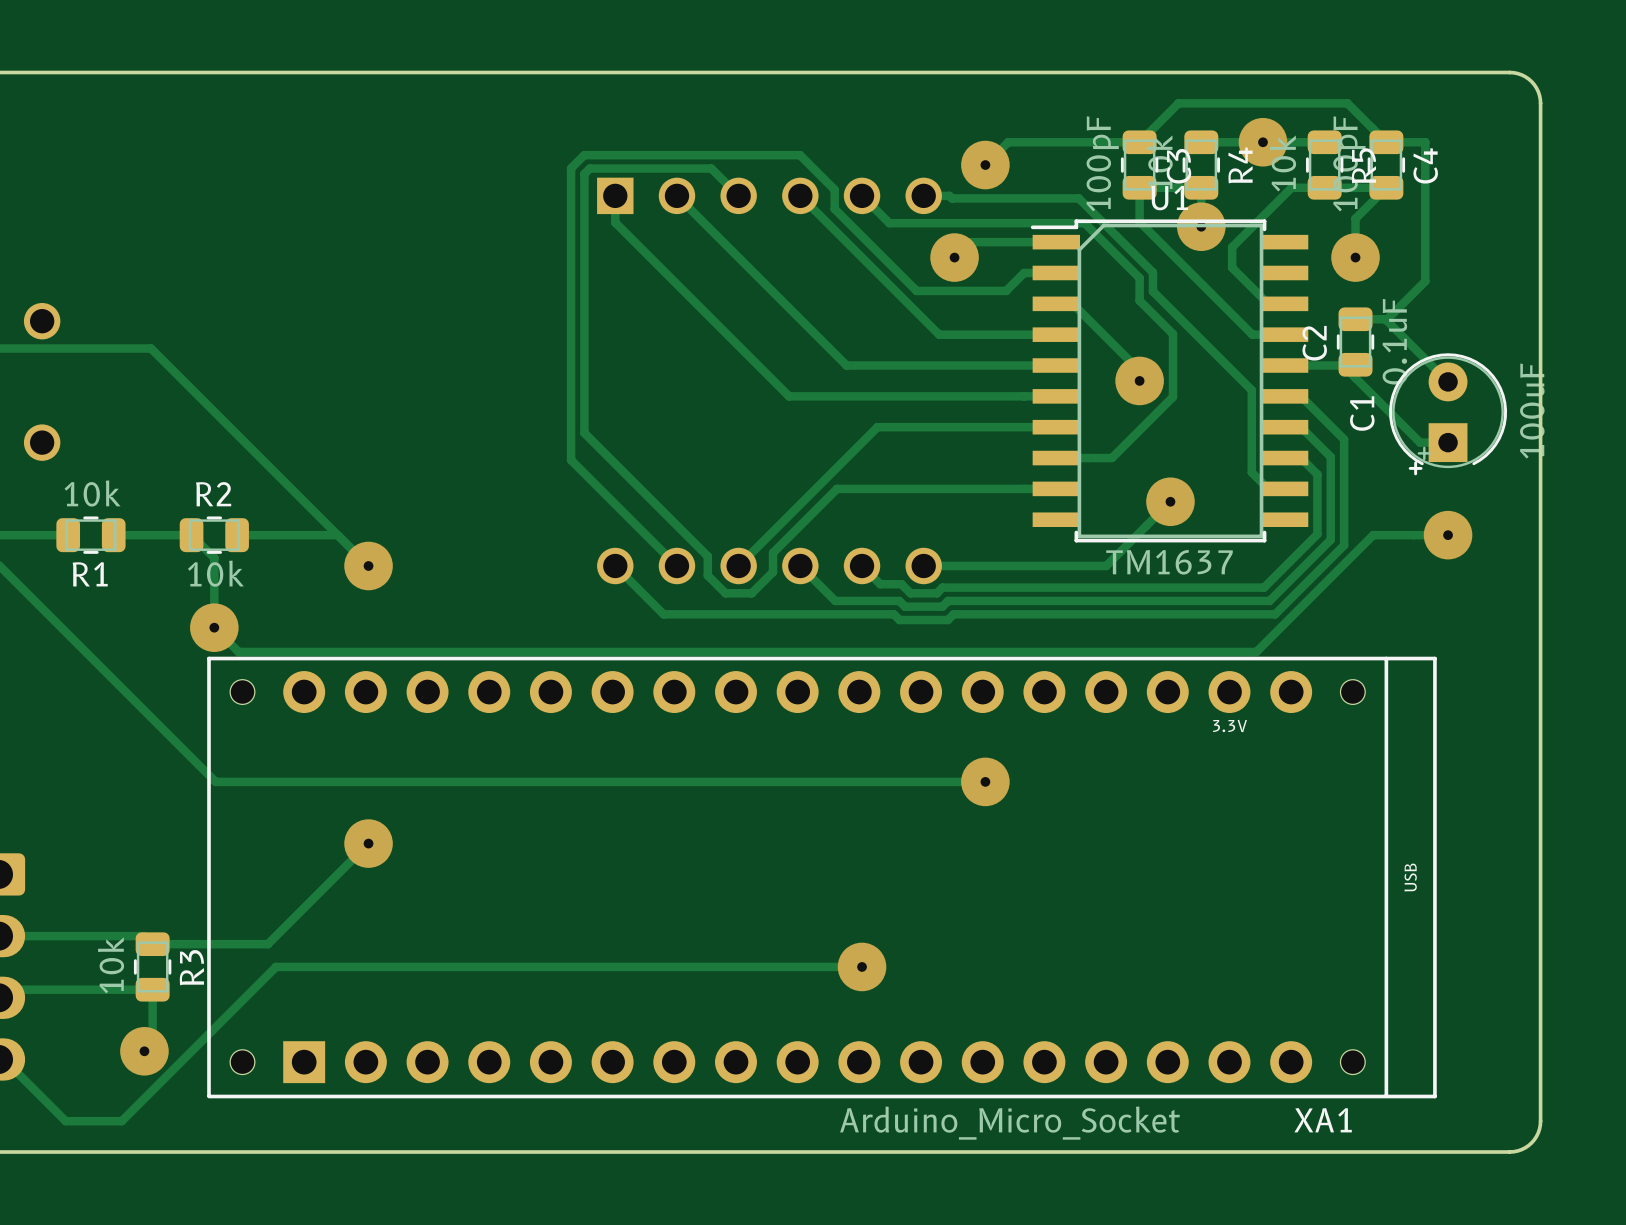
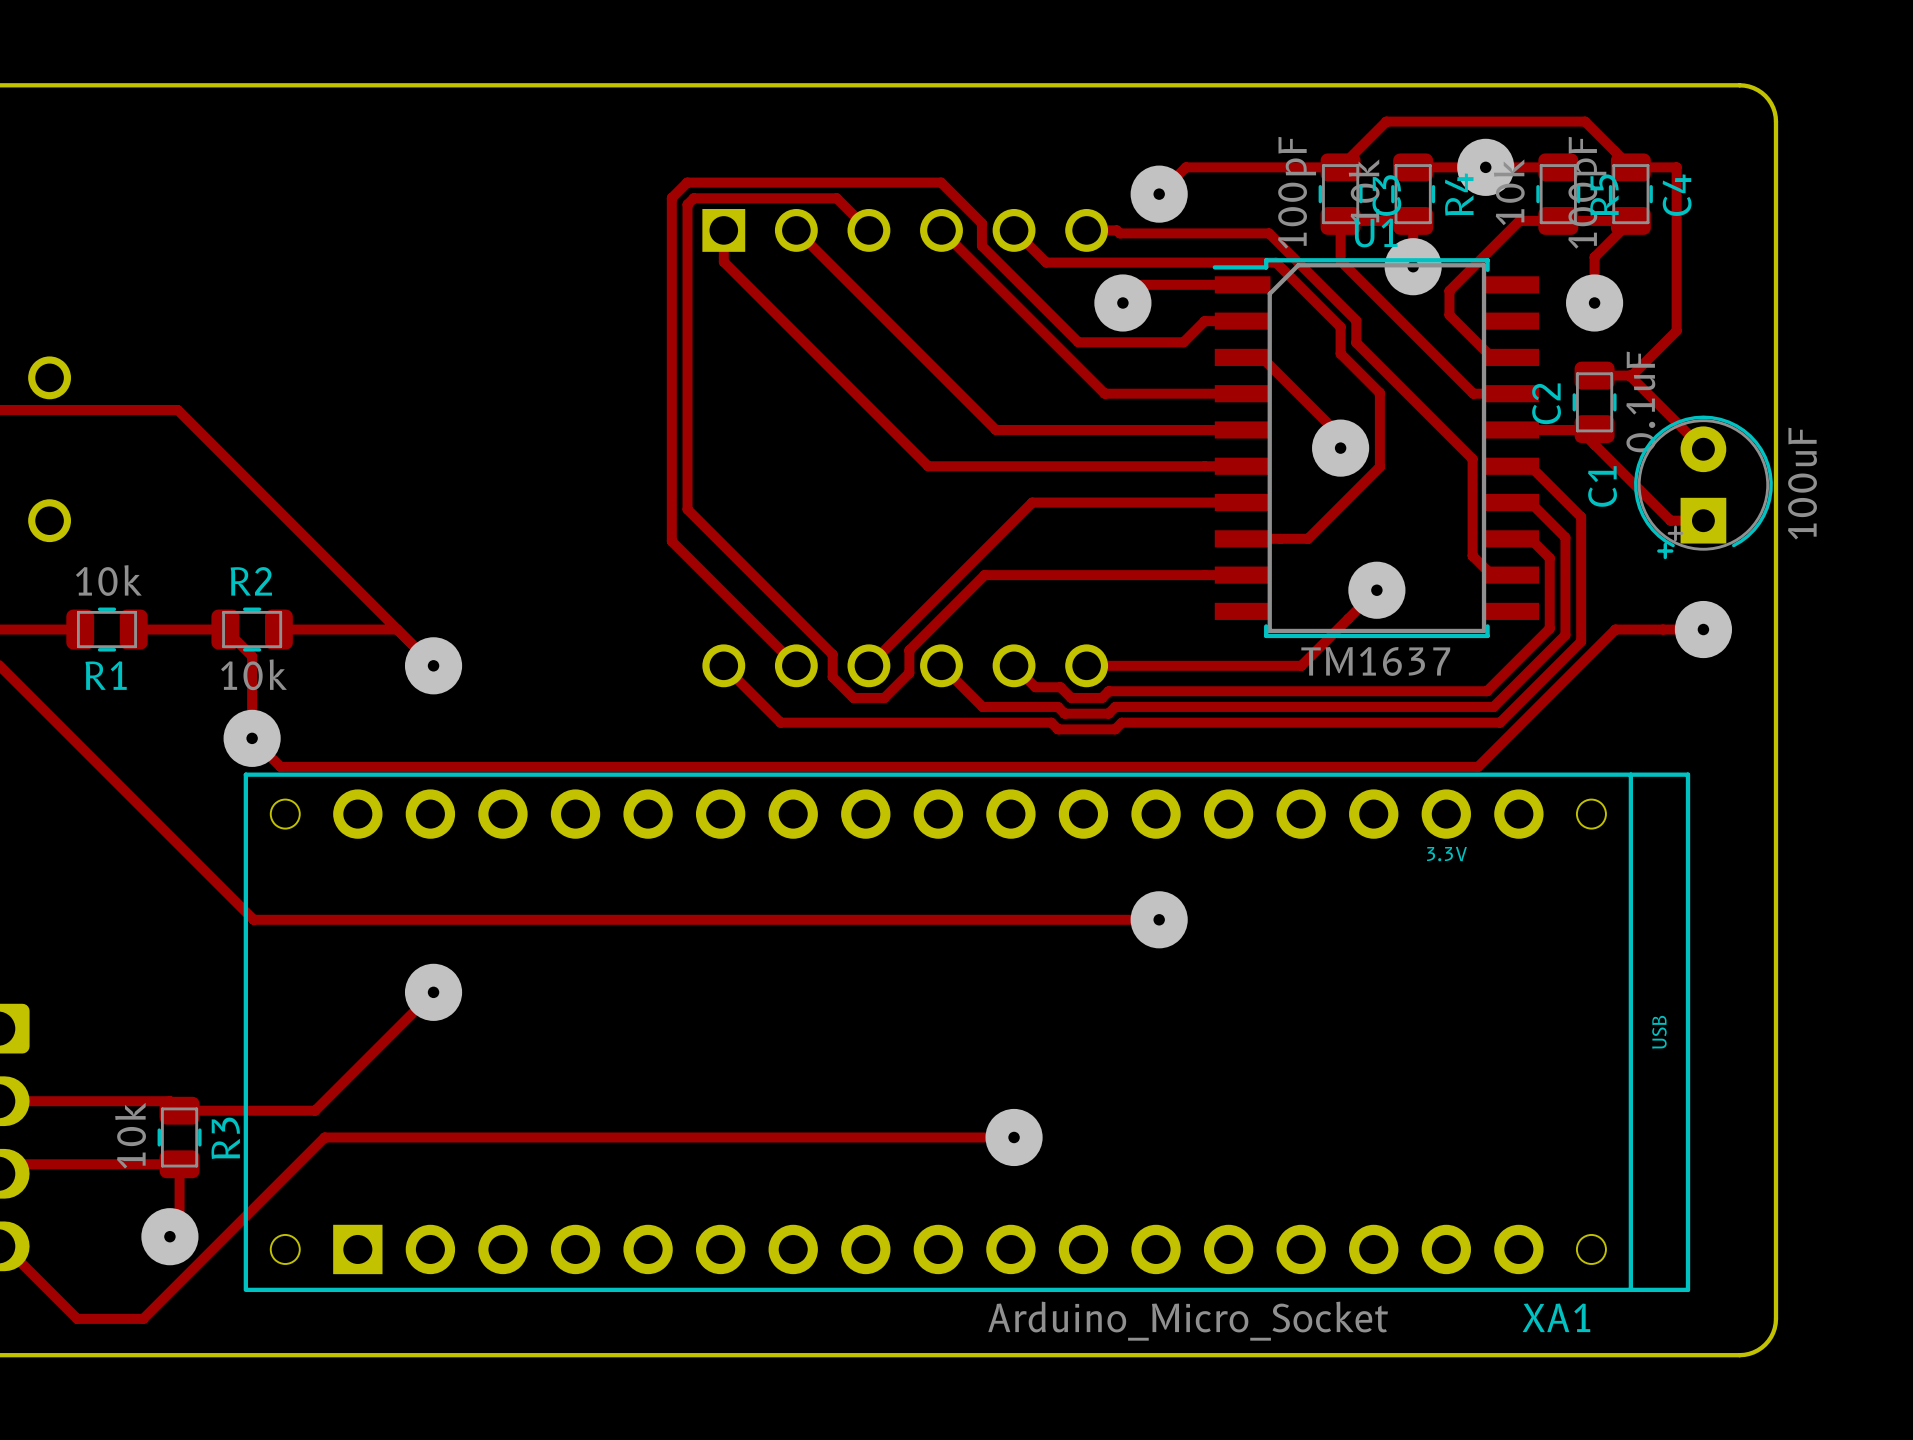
board edge: (1478, 72) (1513, 72) (1525, 76) (1536, 87) (1540, 103) (1540, 1121) (1536, 1136) (1525, 1147) (1513, 1151) (1478, 1152) -> (1739, 85) (1753, 88) (1765, 95) (1773, 107) (1775, 121) (1775, 1318) (1773, 1332) (1765, 1344) (1753, 1352) (1739, 1355)

